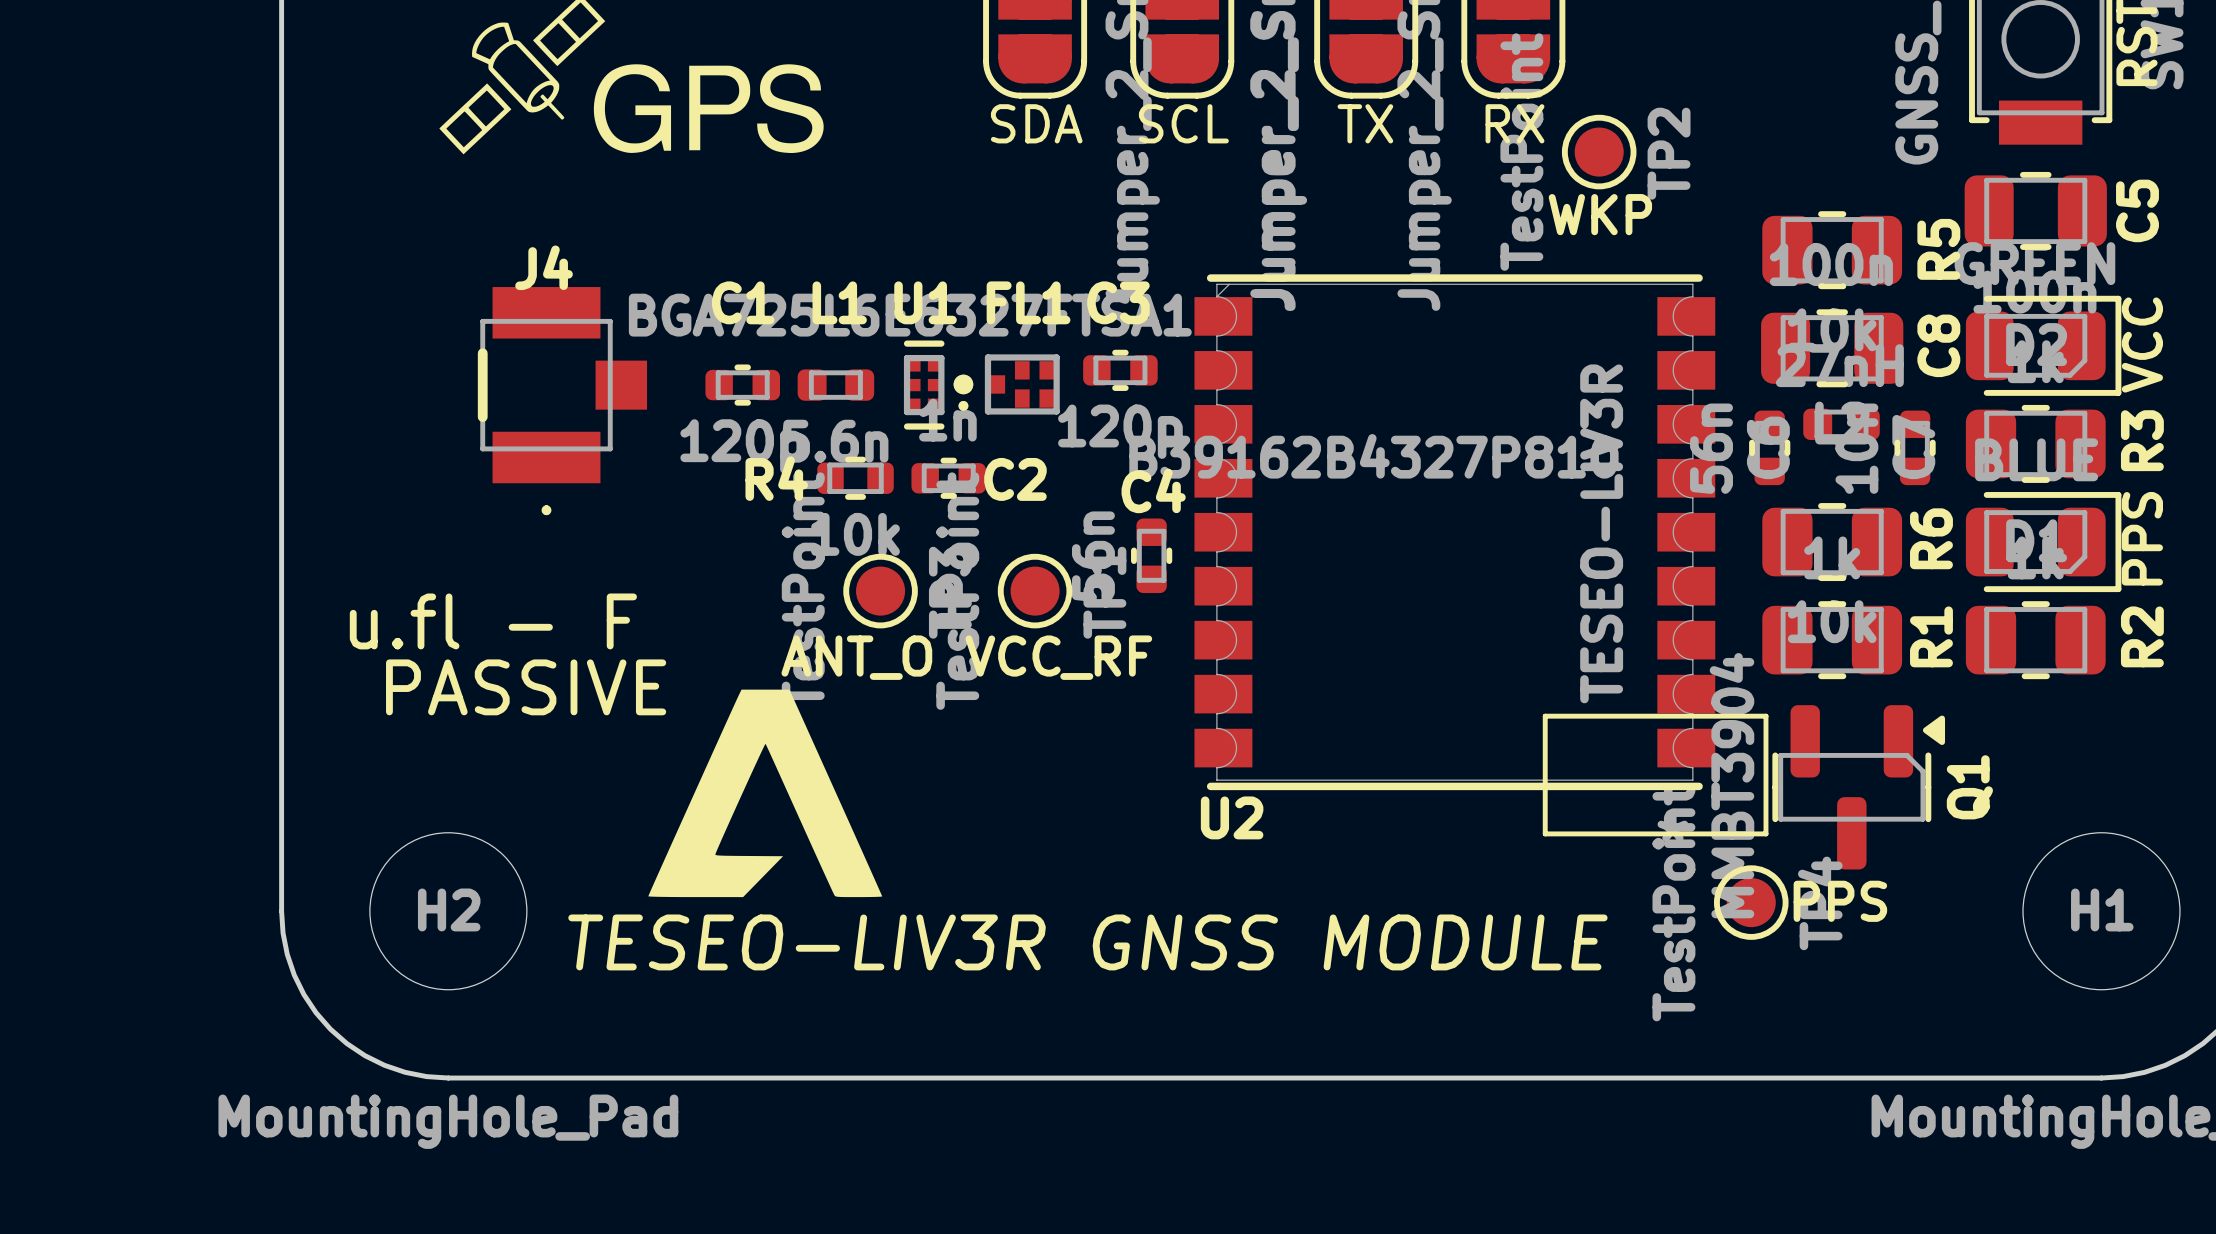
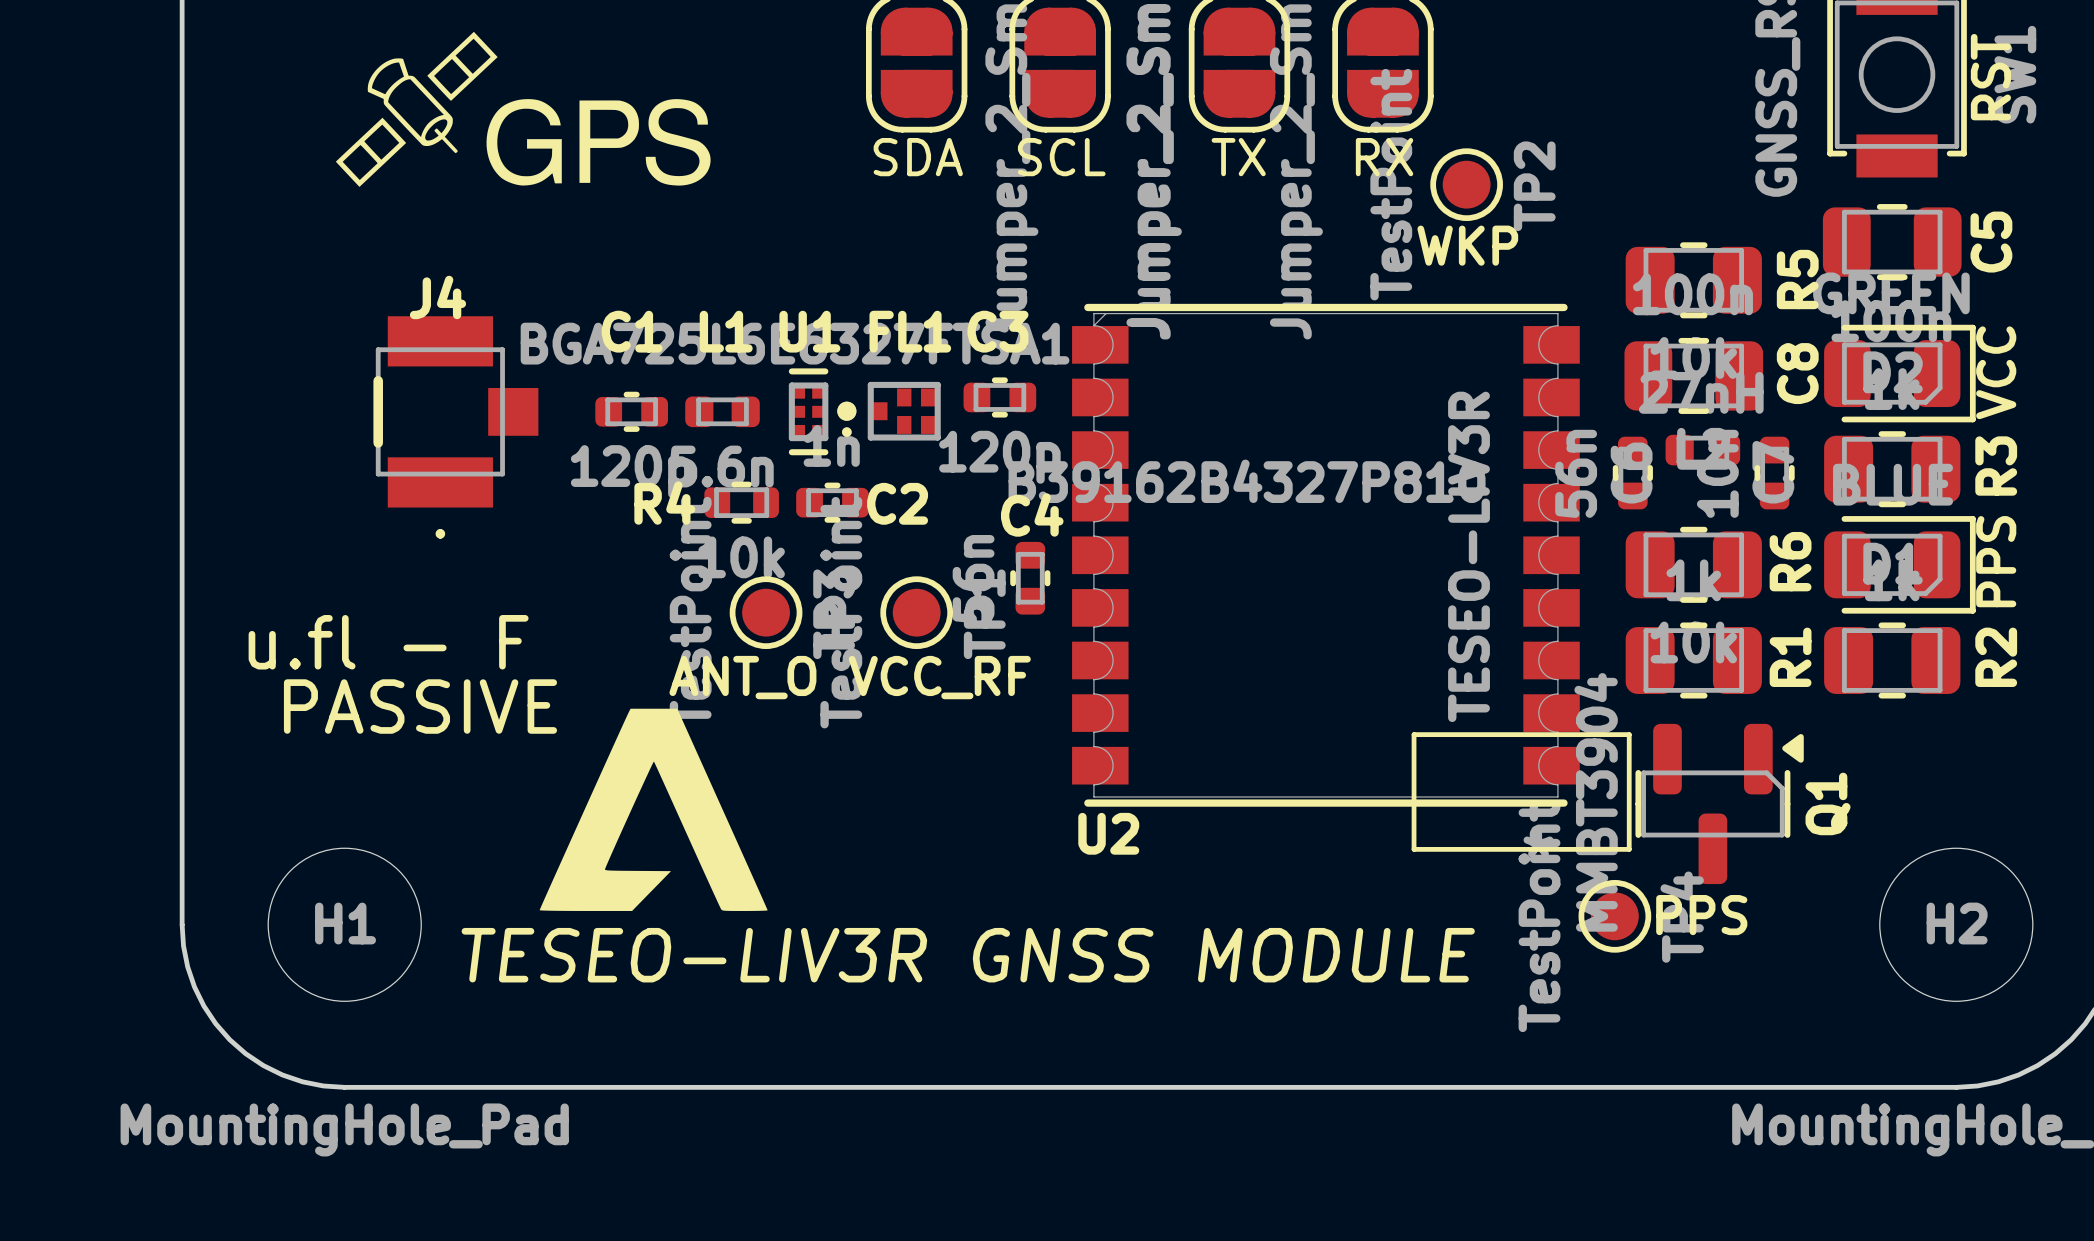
H2 name: H2 (449, 909) -> H1 (345, 923)
H1 name: H1 (2102, 909) -> H2 (1957, 923)

